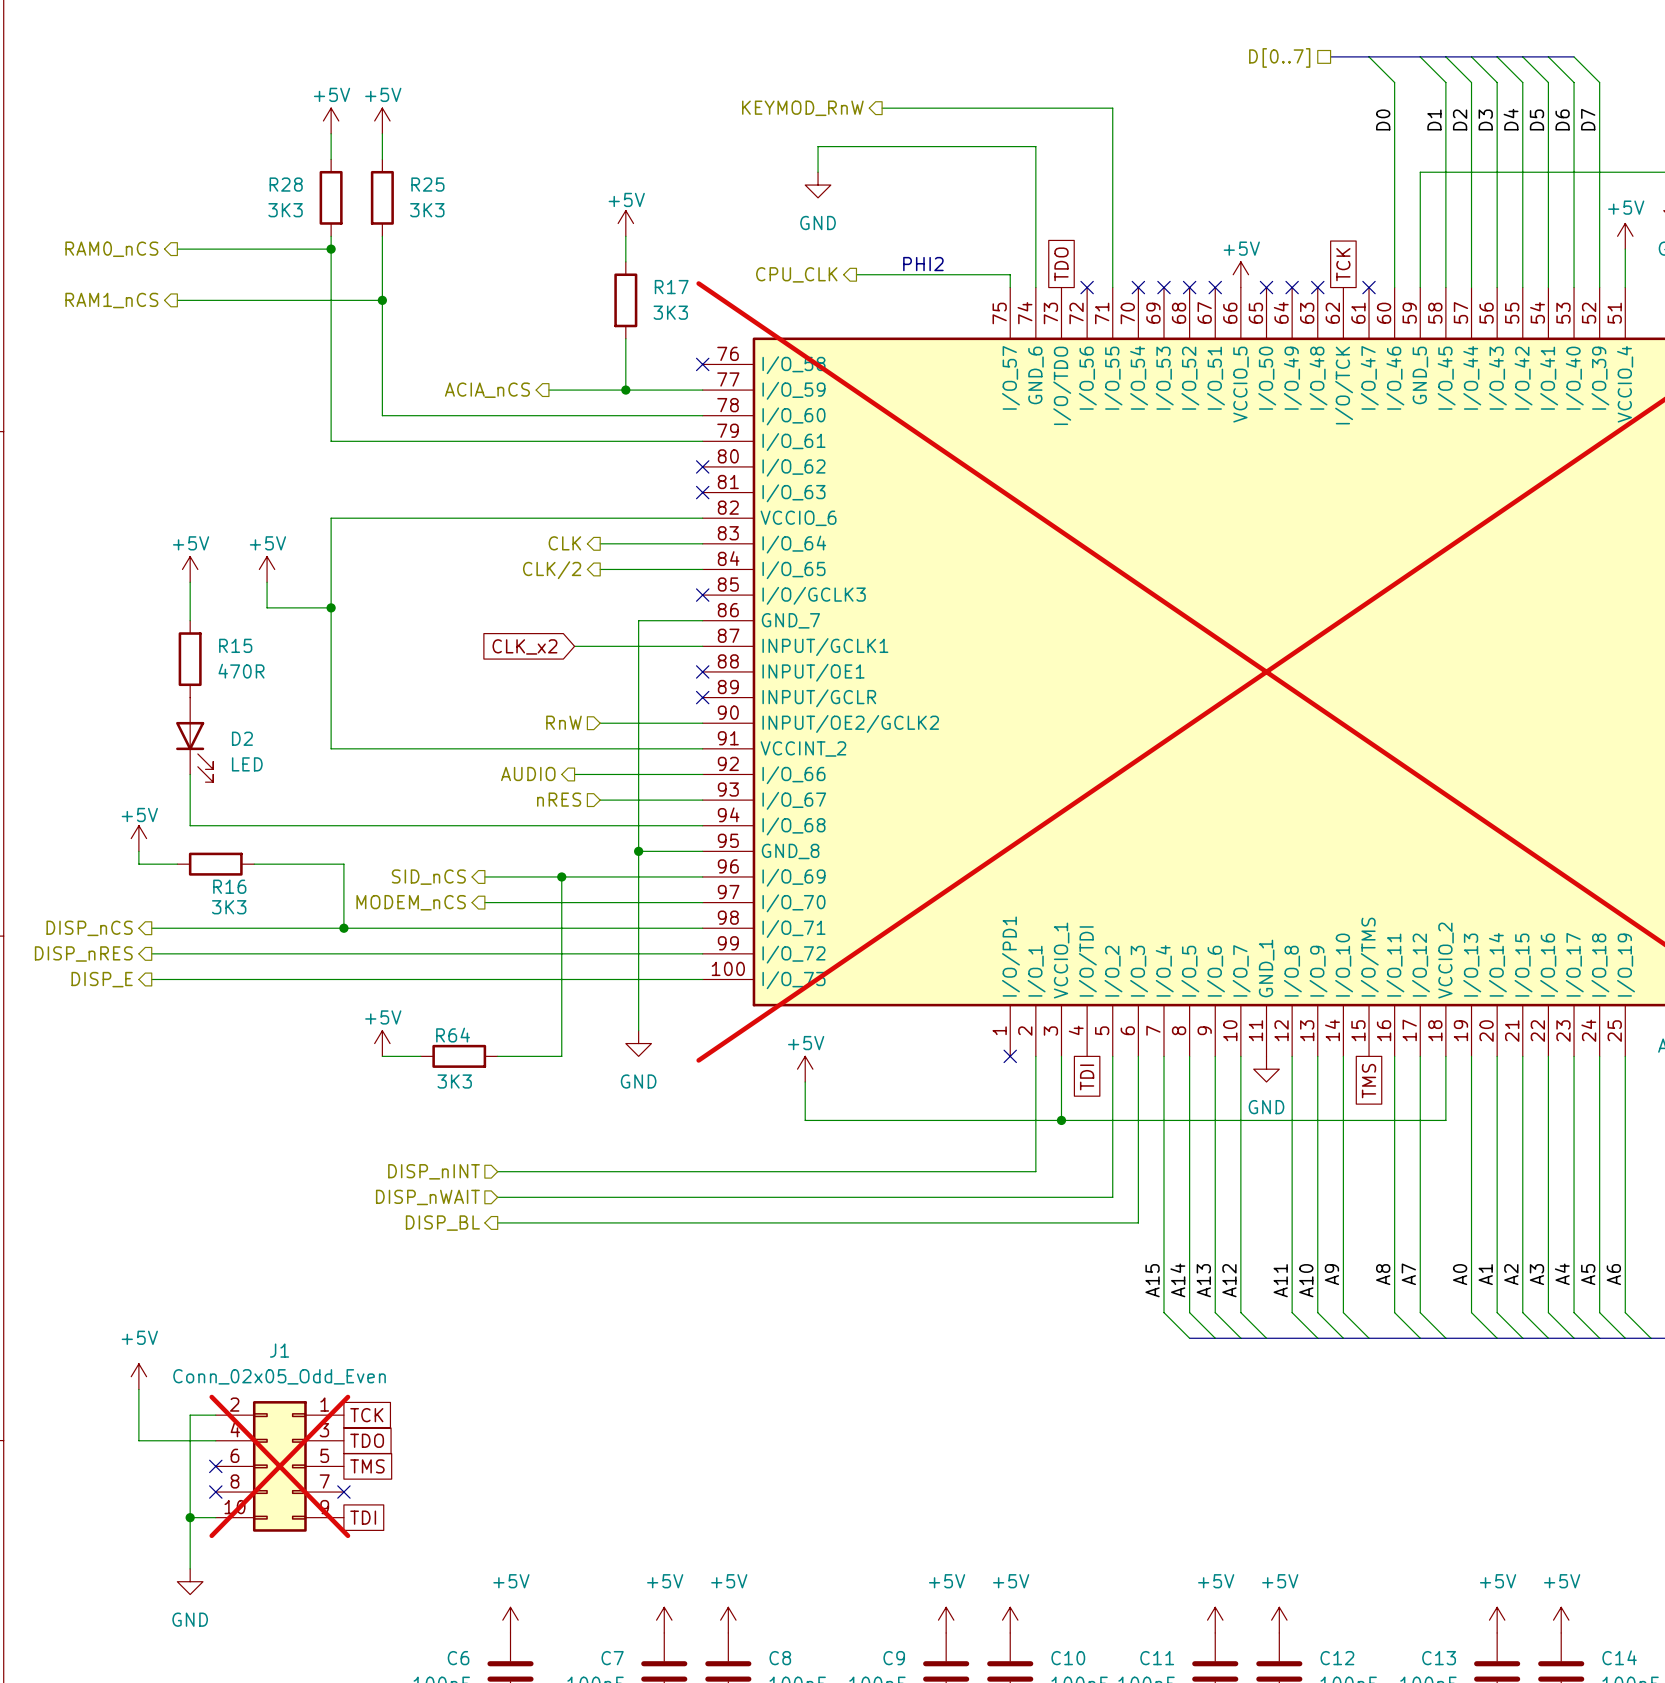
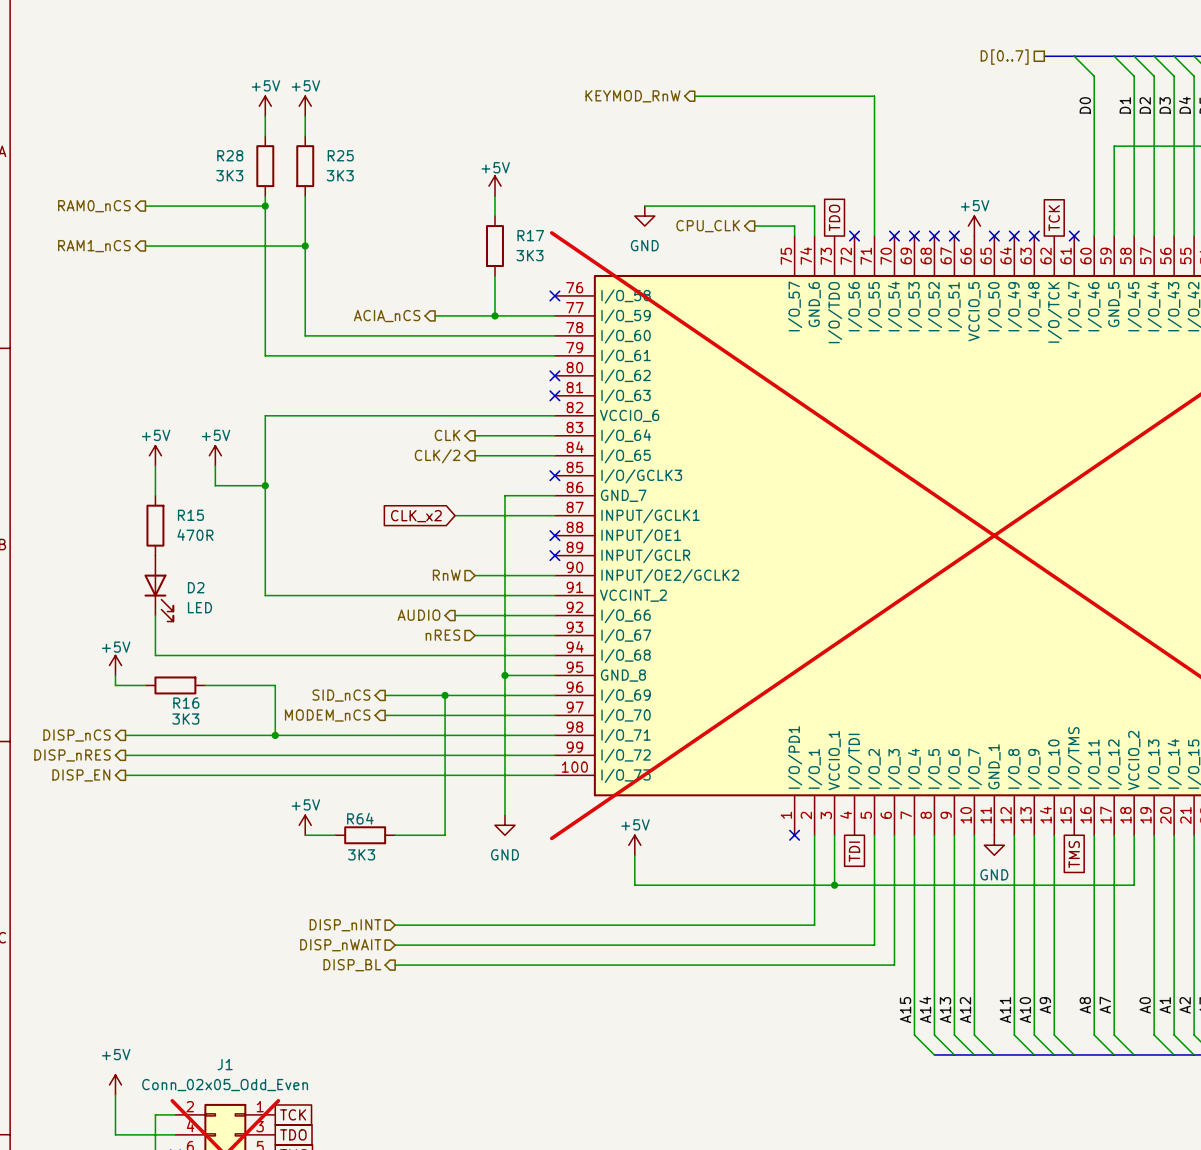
wire: (818, 172) (818, 146) (1035, 146) (1035, 249) -> (644, 206) (814, 206)
power symbol position: GND (818, 185) -> GND (644, 216)
text: PHI2 (923, 264) -> none
hierarchical label position: CPU_CLK (796, 274) -> CPU_CLK (708, 226)
wire: (856, 274) (958, 274) -> none
hierarchical label: DISP_E (102, 979) -> DISP_EN (81, 775)

